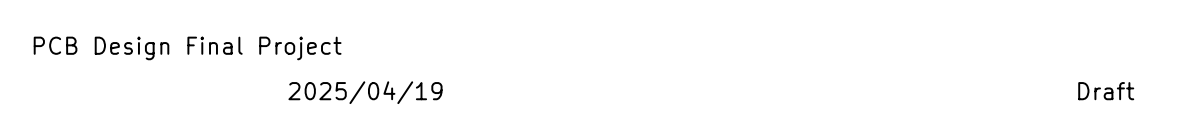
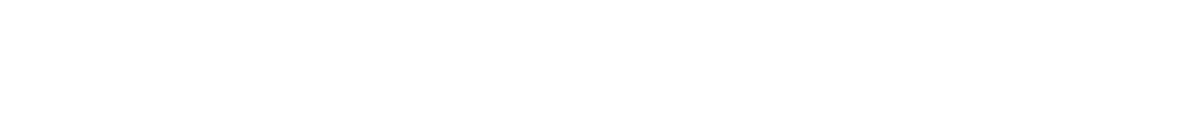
text: PCB Design Final Project (187, 48) -> none
text: Draft (1106, 91) -> none
text: 2025/04/19 (365, 92) -> none

